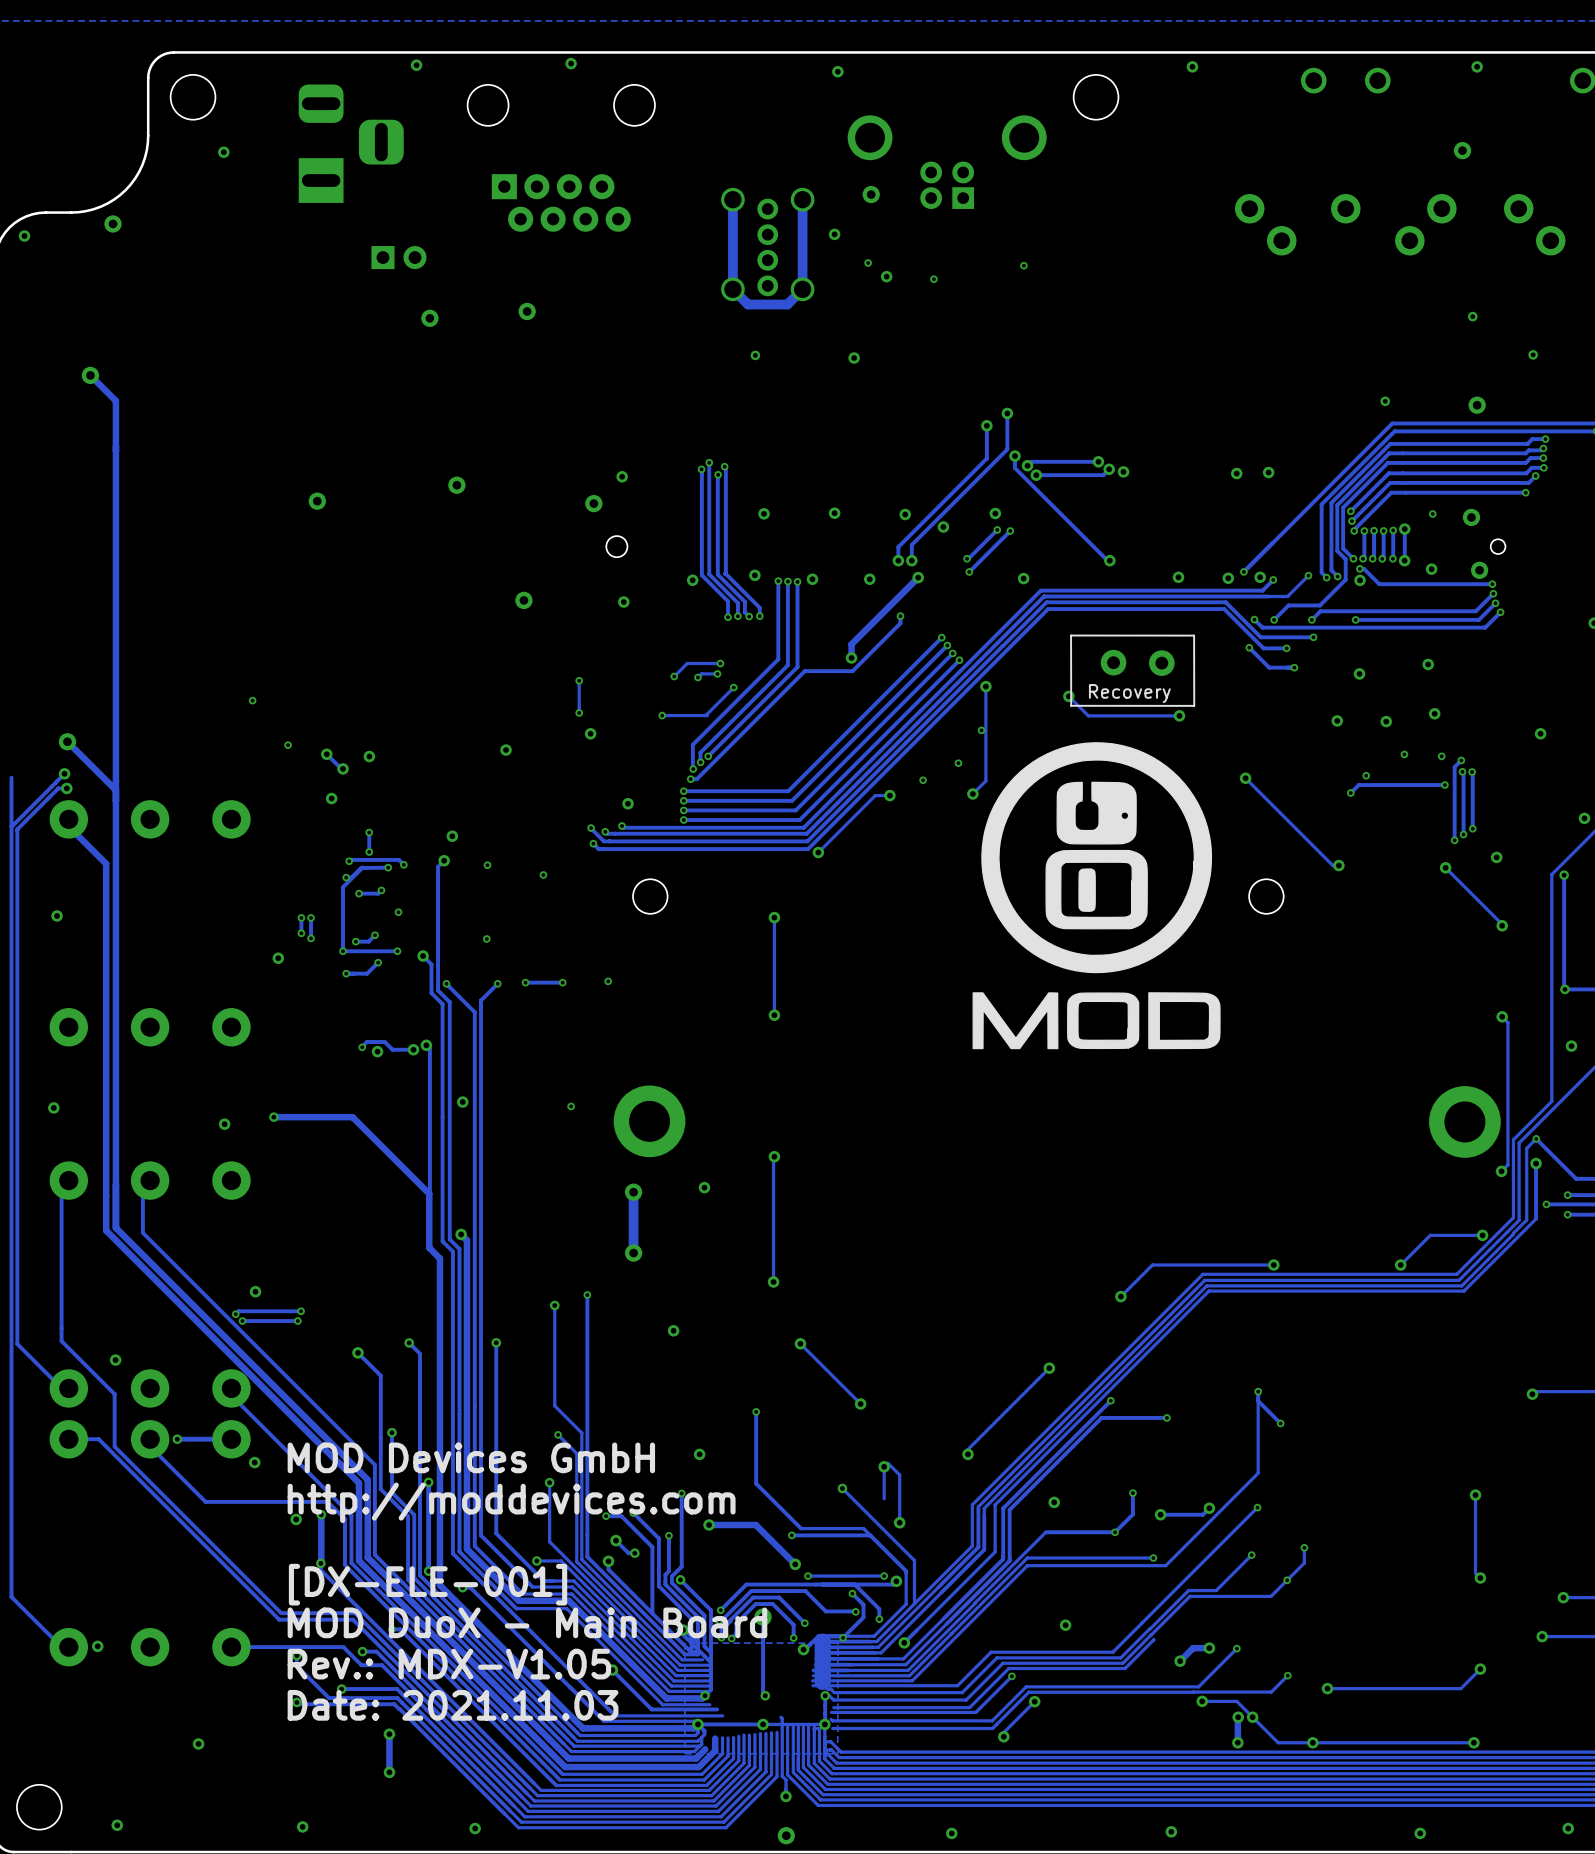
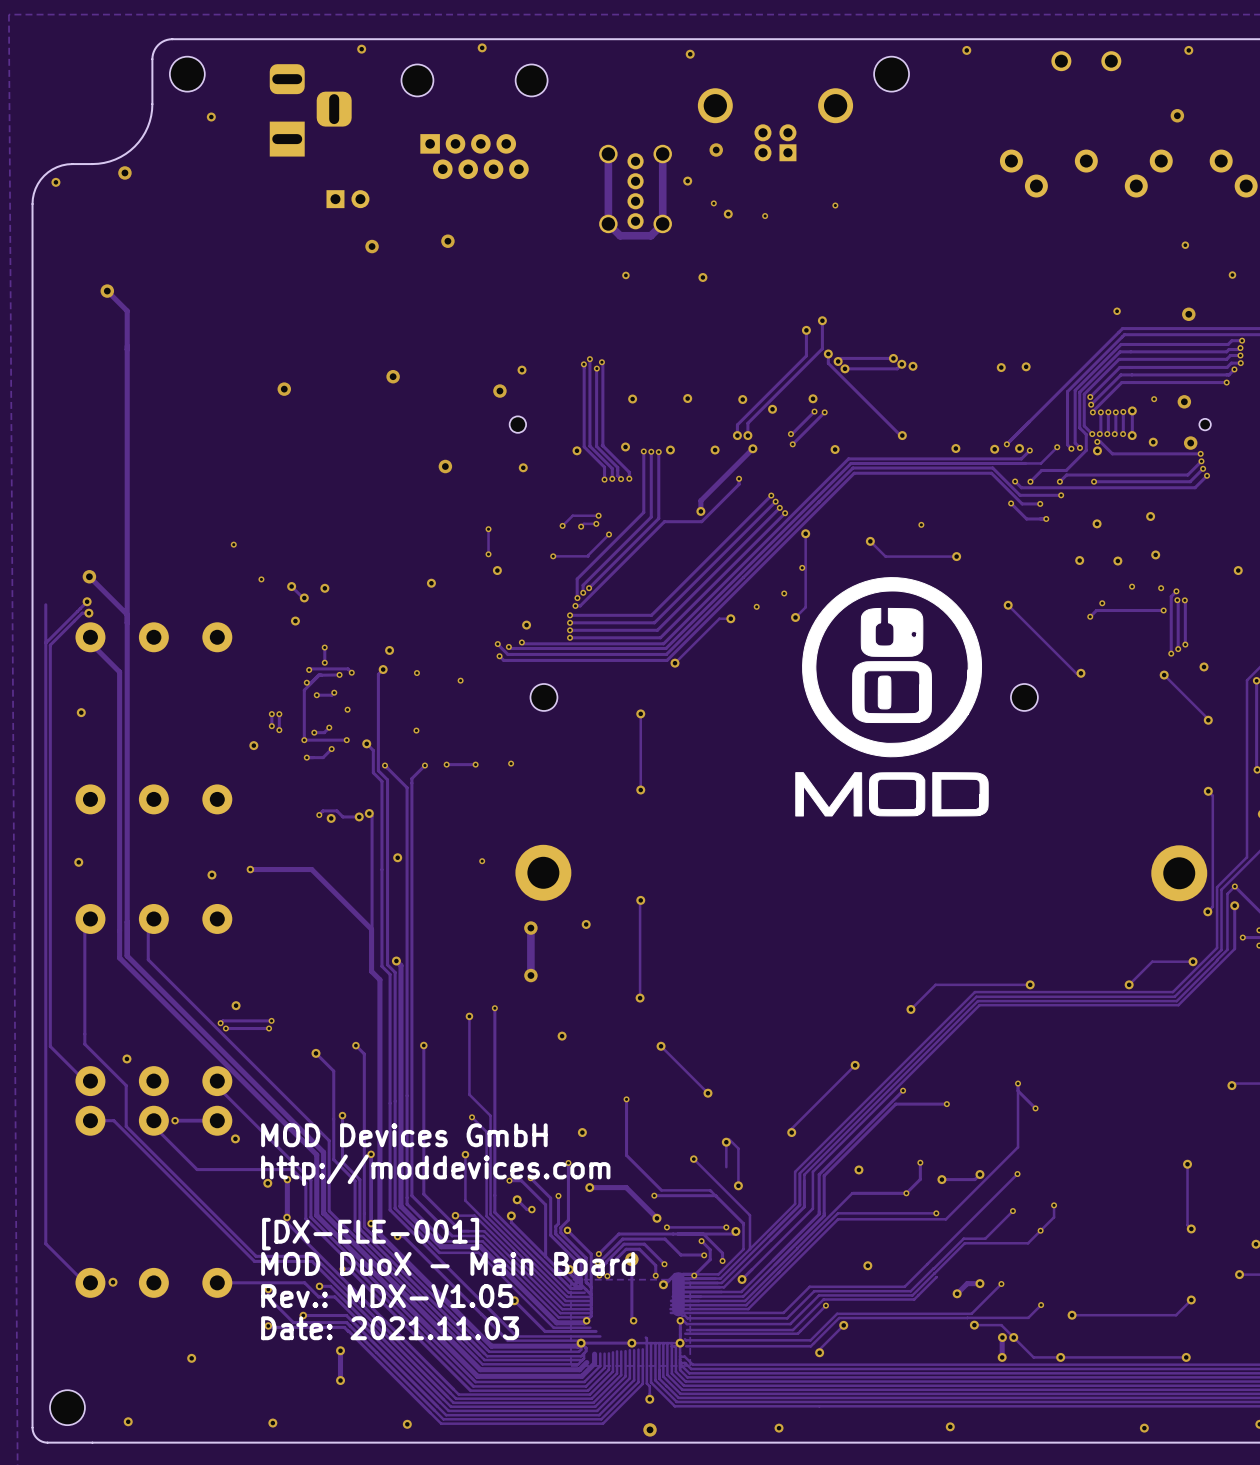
line: (1071, 635) (1194, 635) (1194, 705) (1071, 705) (1071, 635) -> none
part: (1113, 662) -> none
part: (1161, 663) -> none
via: none -> (921, 524)
text: Recovery (1129, 693) -> none

